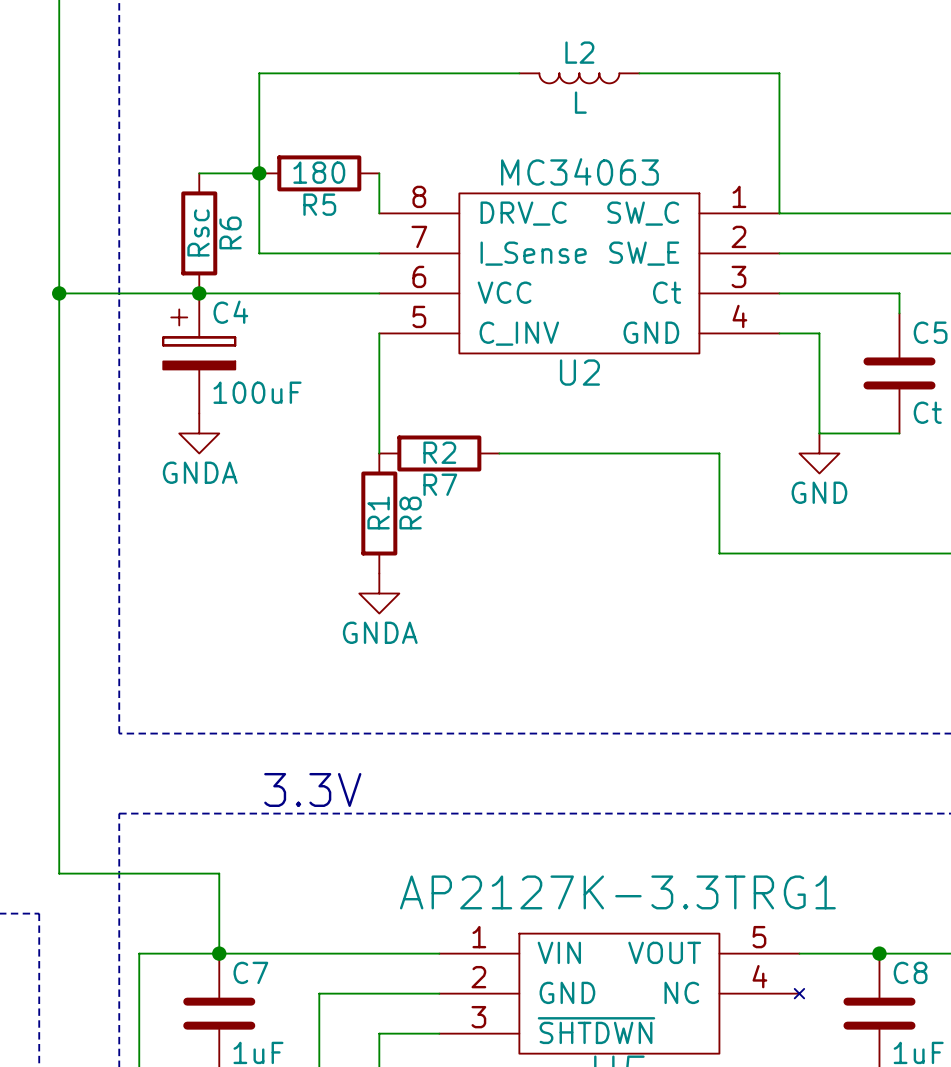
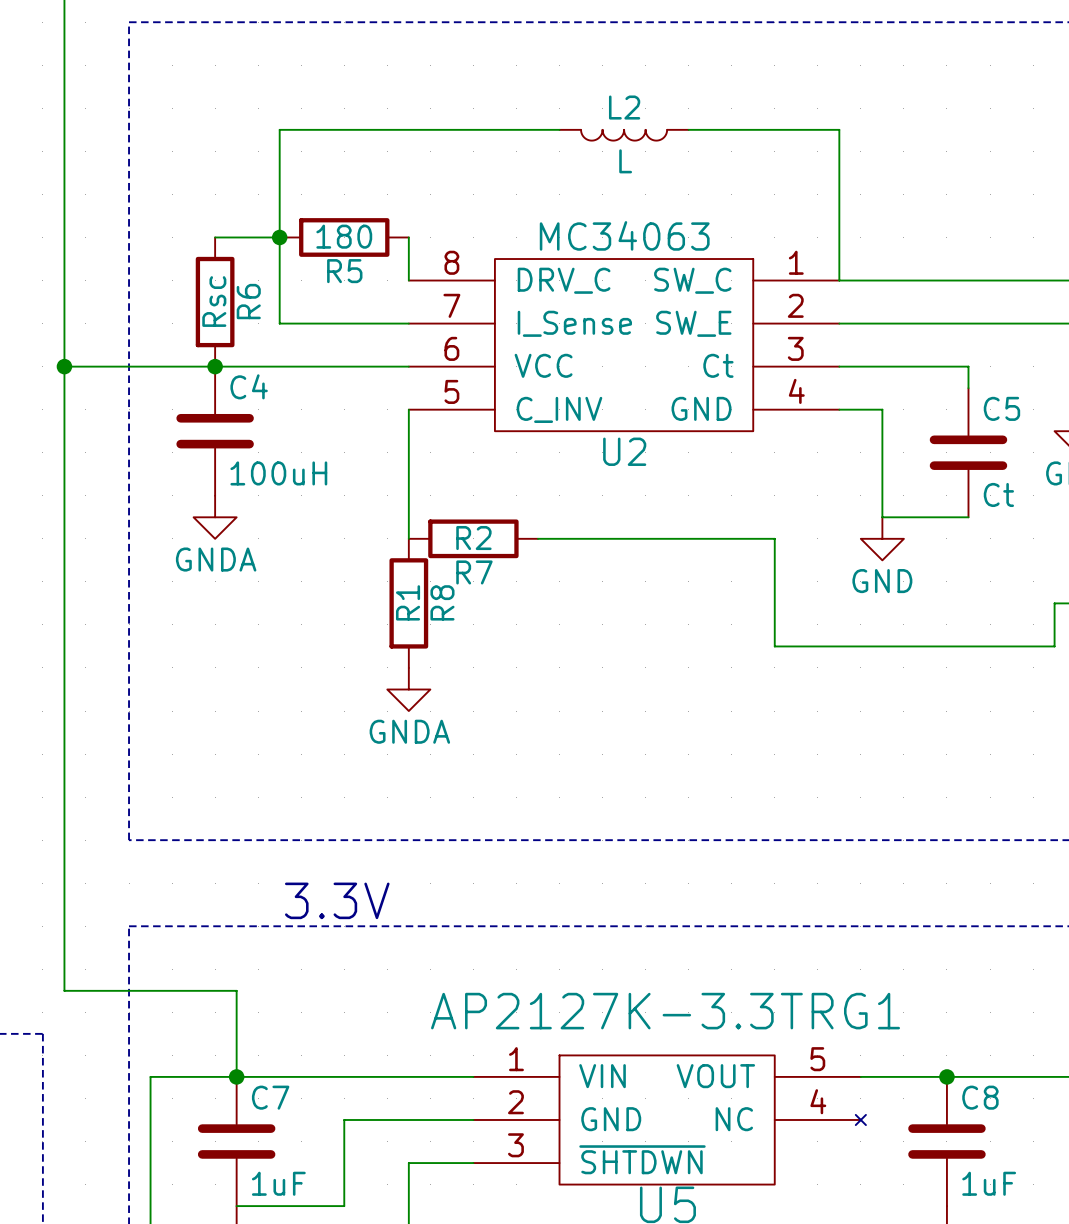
C4 symbol: [163, 293, 236, 414] -> [176, 366, 254, 496]
C4 value: 100uF (257, 392) -> 100uH (278, 473)

